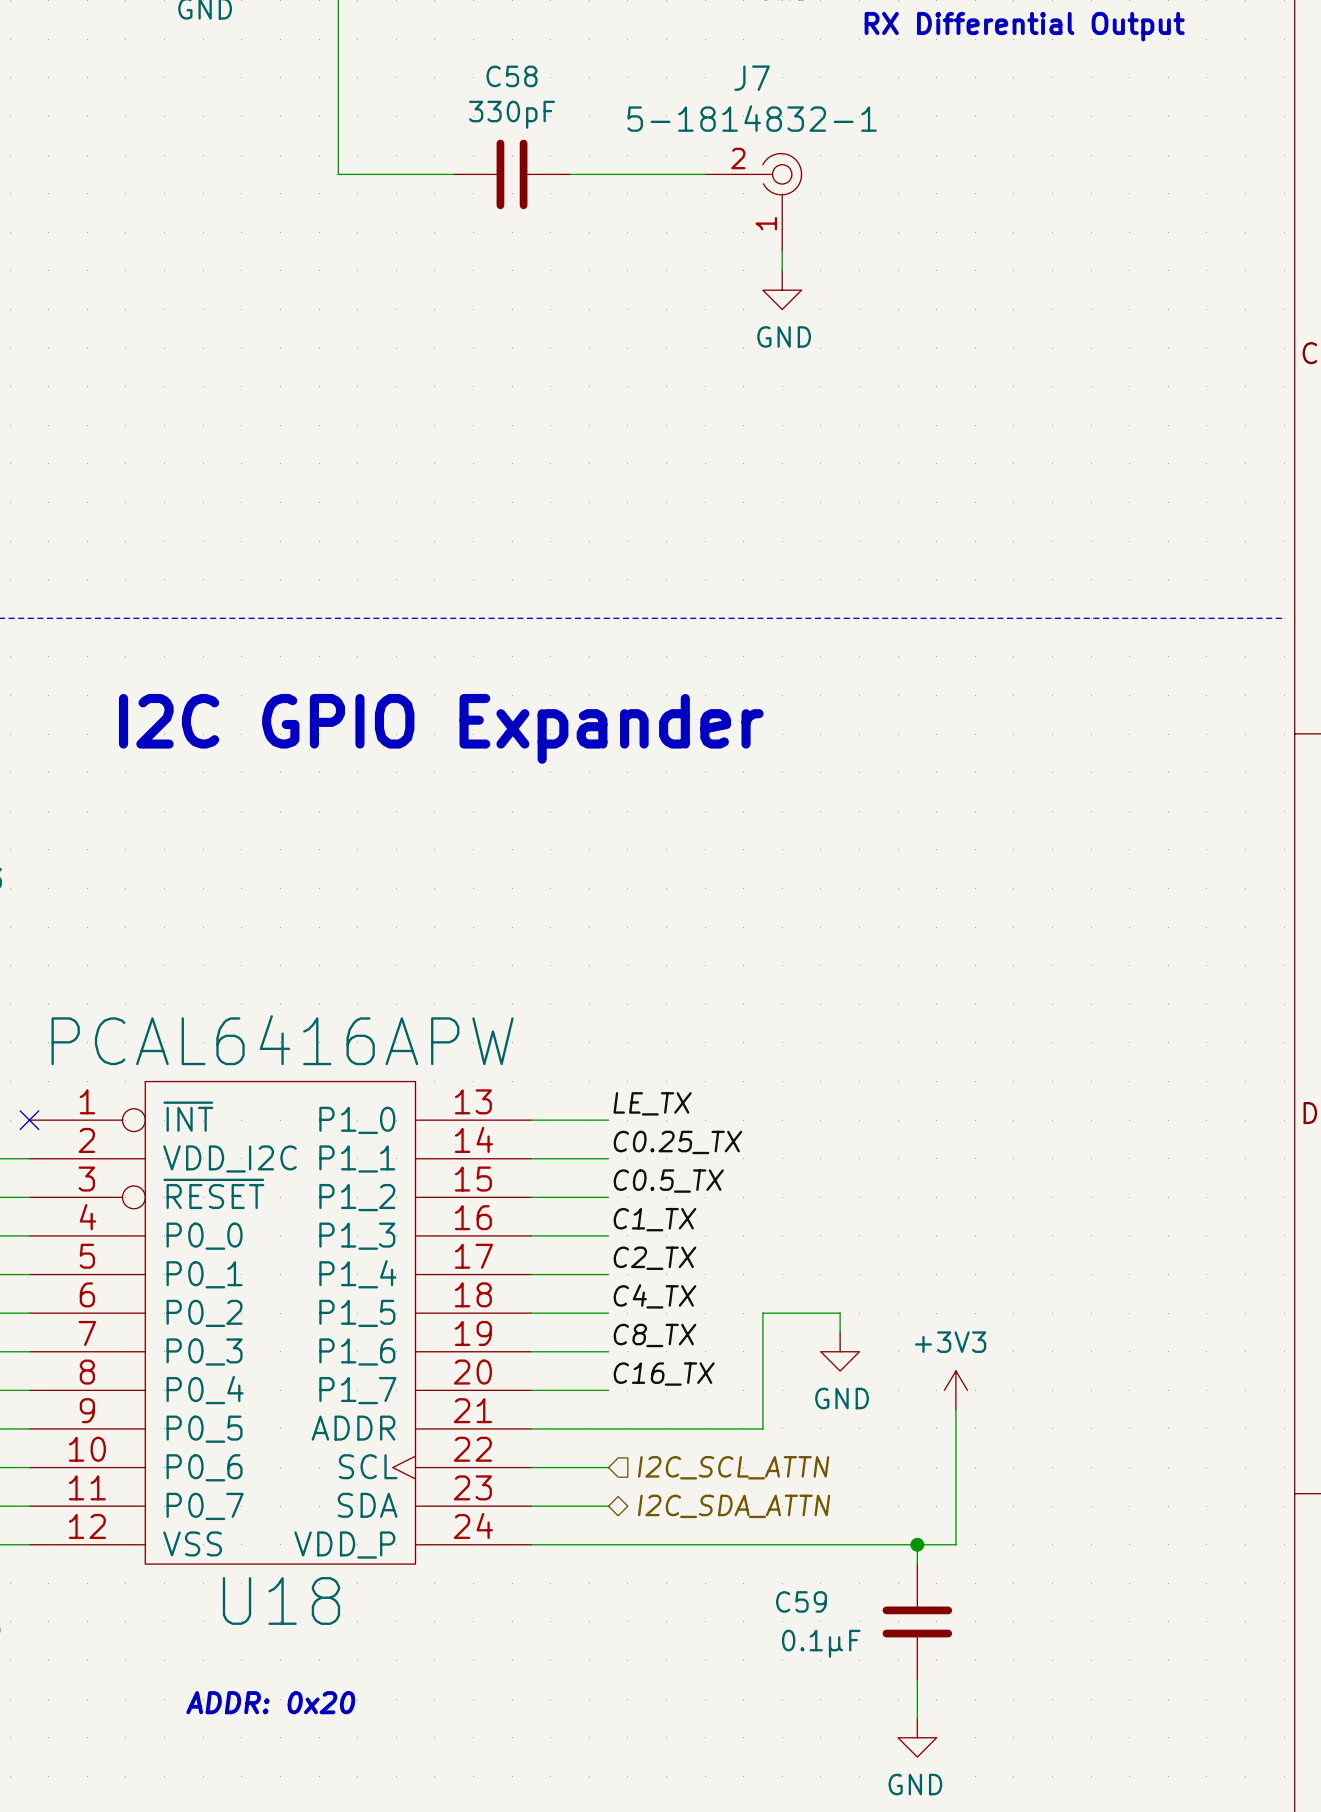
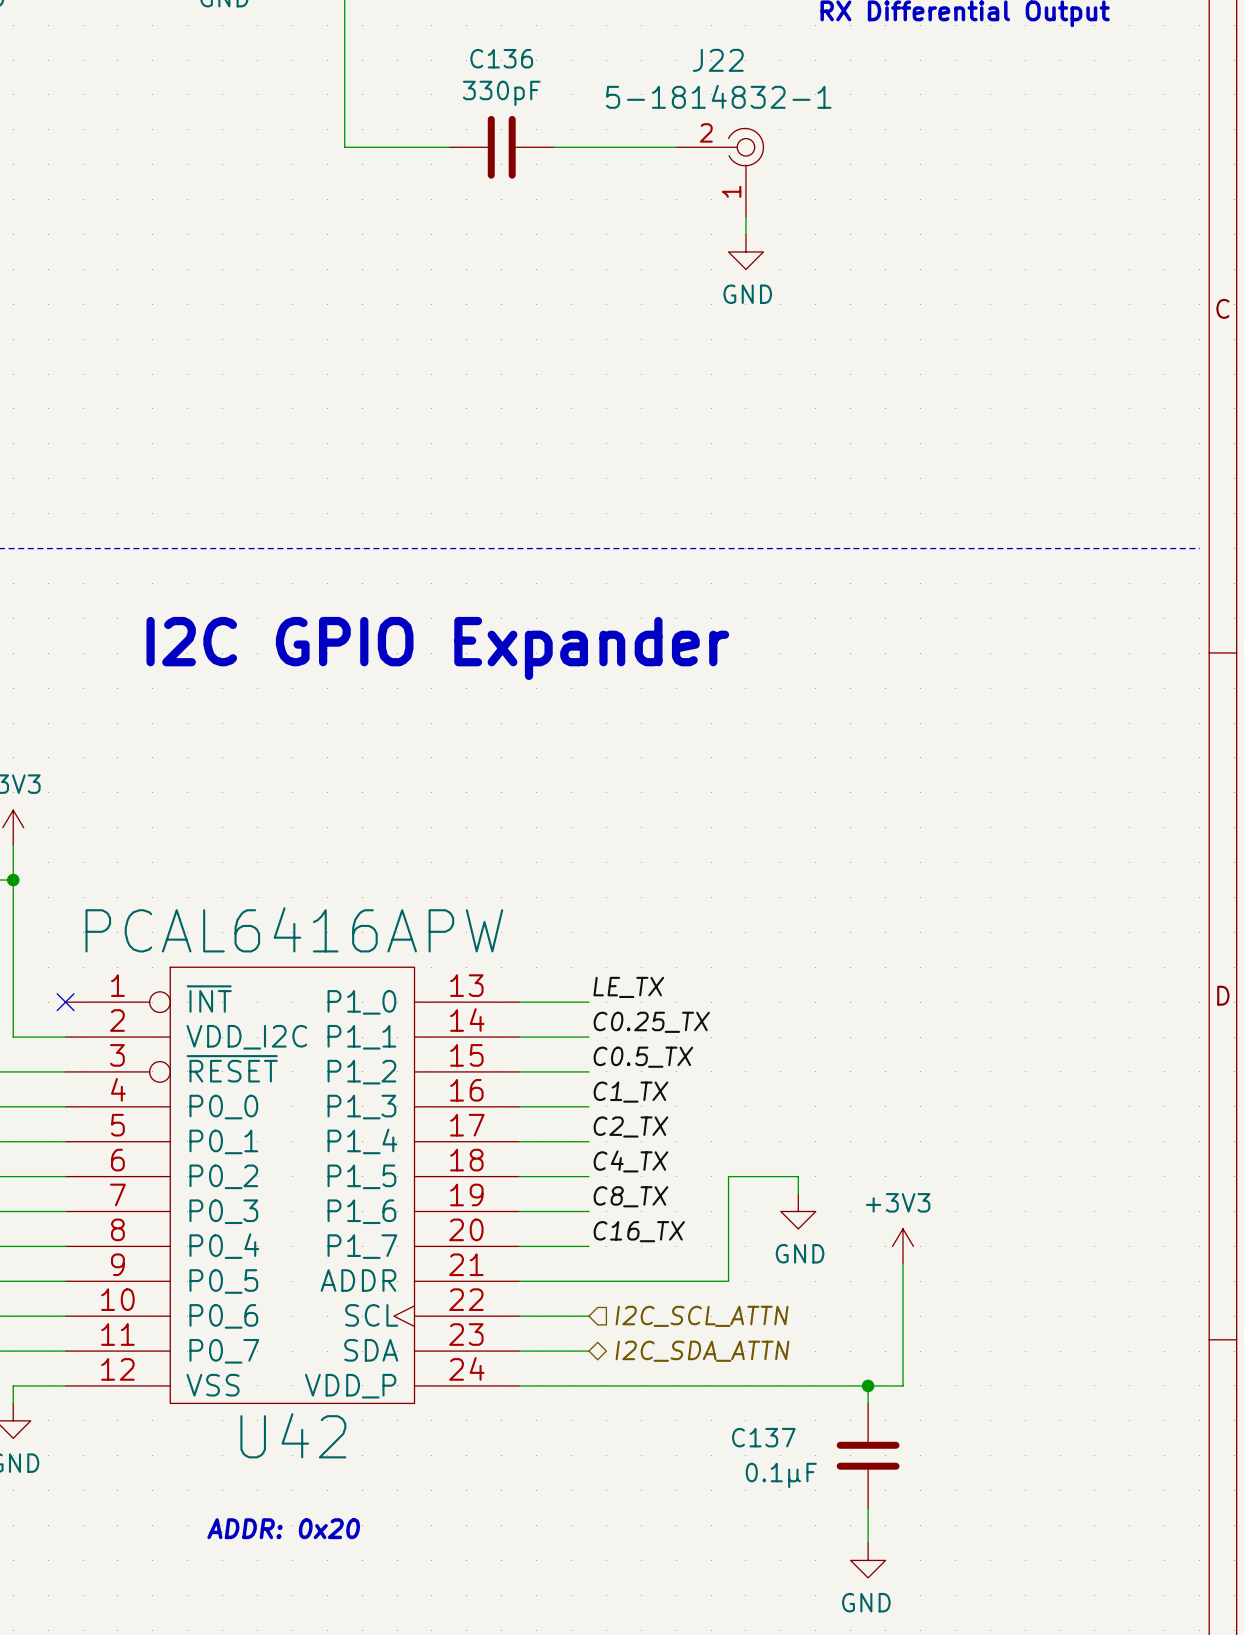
C58 name: C58 (512, 76) -> C136 (501, 58)
J7 name: J7 (752, 78) -> J22 (718, 60)
U18 name: U18 (281, 1600) -> U42 (293, 1435)
C59 name: C59 (801, 1601) -> C137 (763, 1437)

